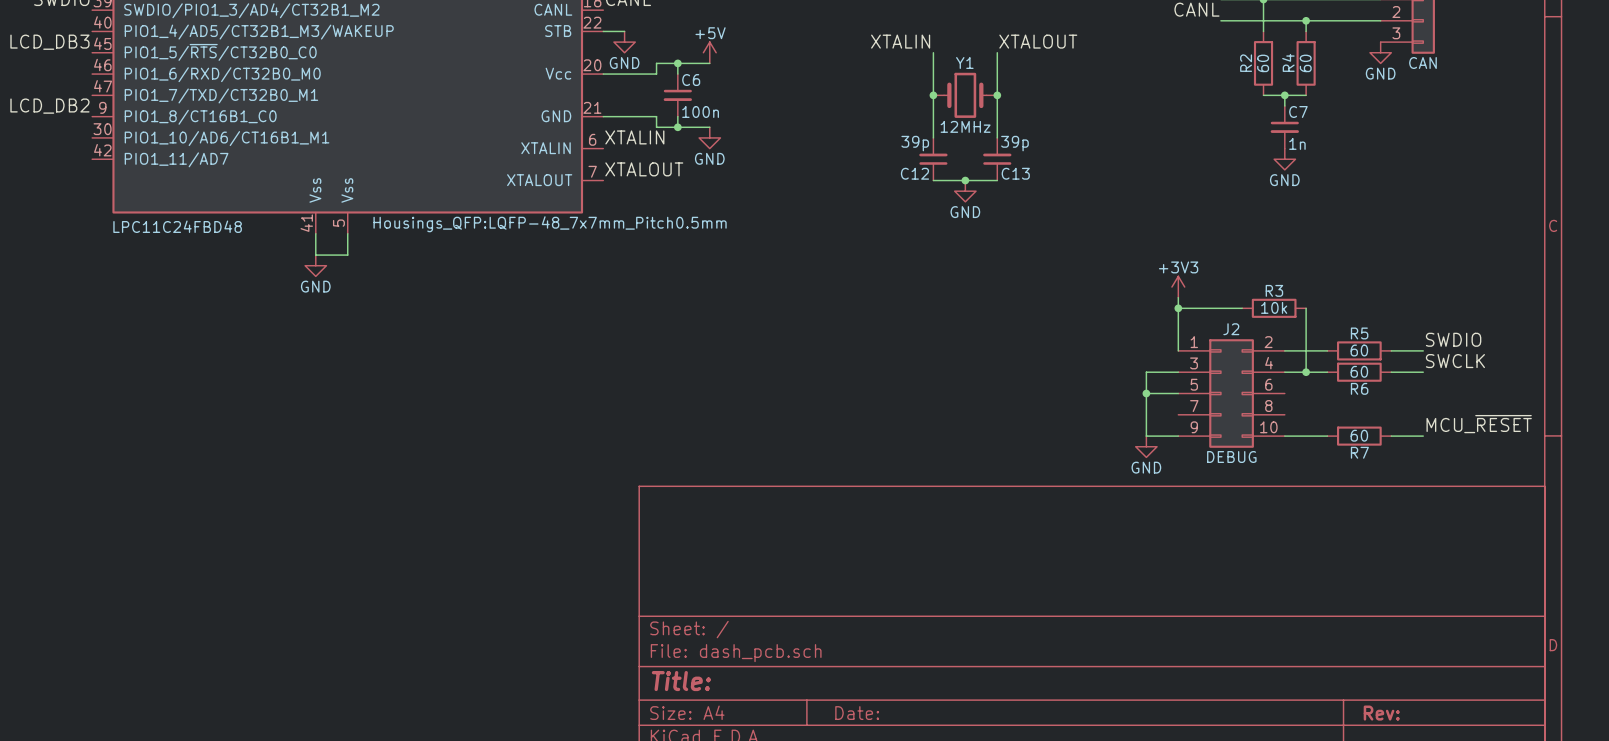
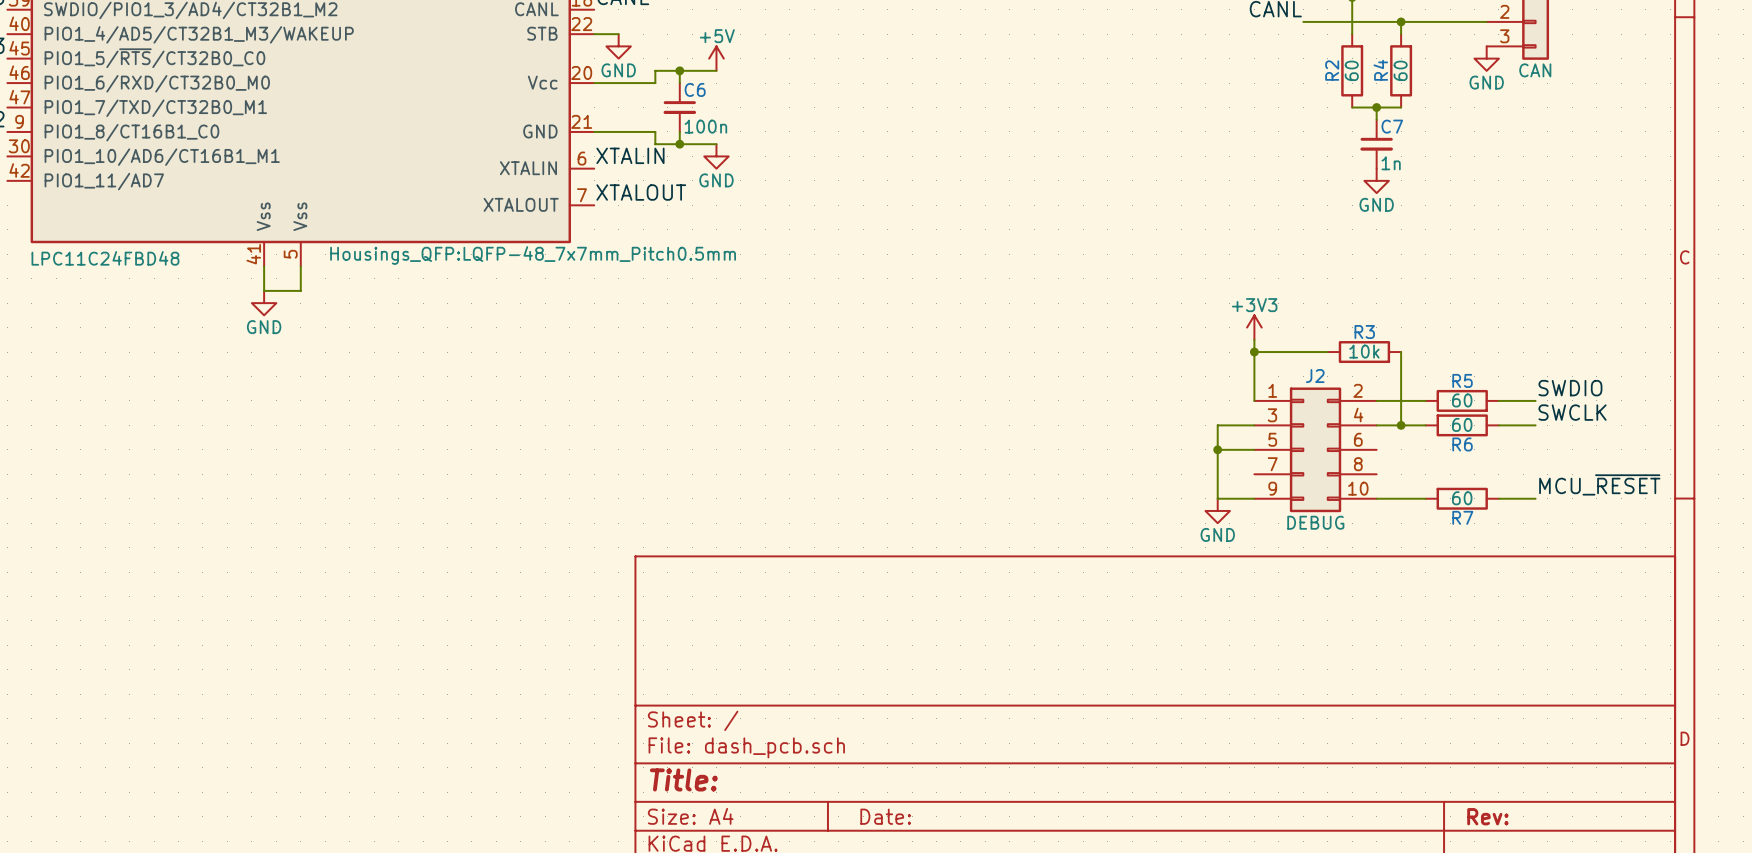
label: XTALIN (900, 41) -> none
label: XTALOUT (1038, 41) -> none
wire: (933, 52) (933, 137) -> none
wire: (997, 52) (997, 137) -> none
junction: (933, 95) -> none
Y1: 12MHz (965, 95) -> none
junction: (997, 95) -> none
C12: 39p (933, 159) -> none
C13: 39p (997, 159) -> none
wire: (933, 180) (997, 180) -> none
junction: (965, 180) -> none
power symbol: GND (965, 191) -> none

